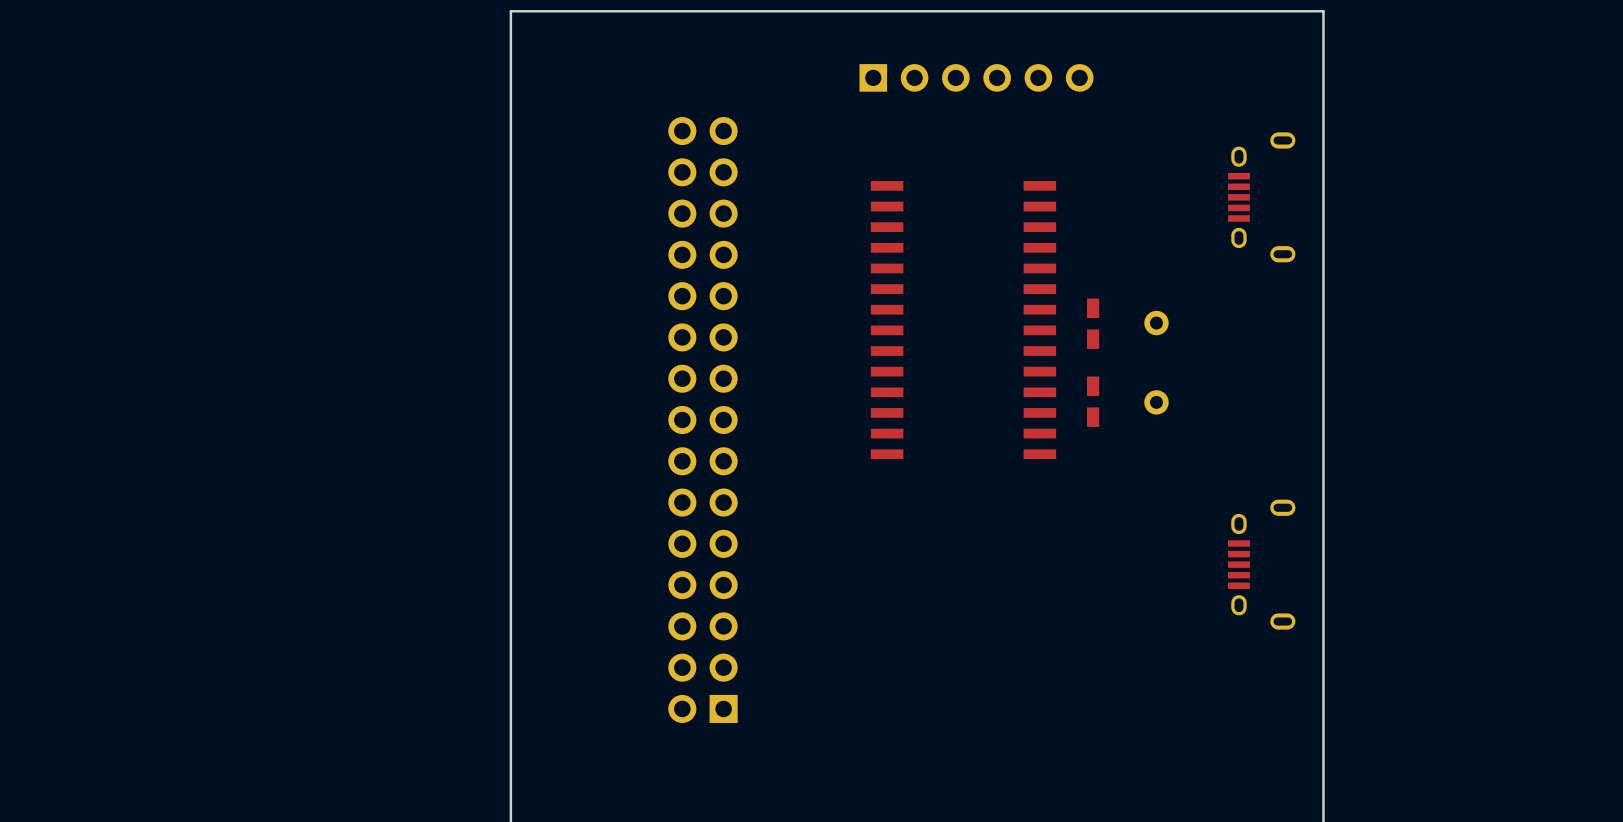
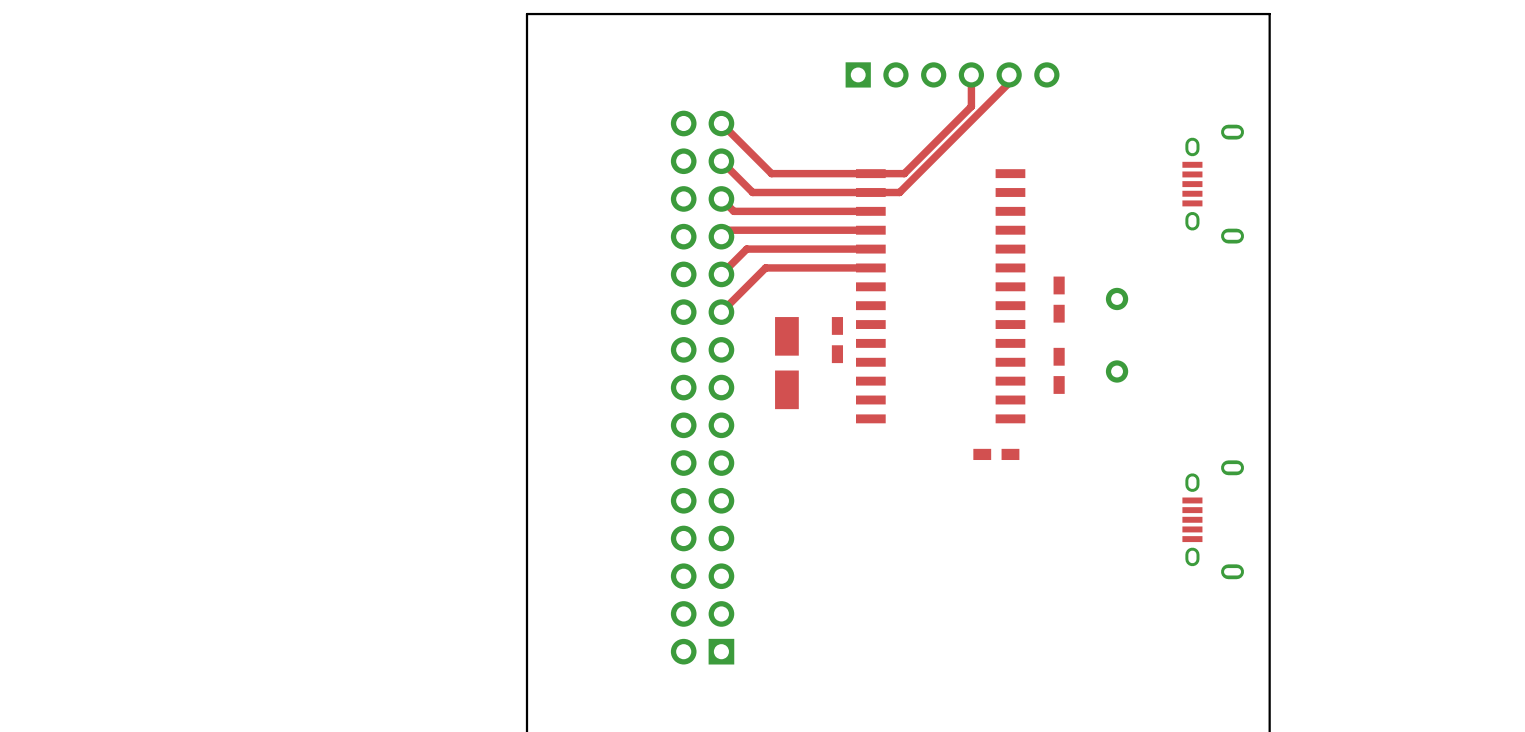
top track: none -> (971, 74) (971, 106) (904, 173) (771, 173) (721, 123)
top track: none -> (1009, 74) (1009, 82) (899, 192) (752, 192) (721, 161)
top track: none -> (721, 198) (733, 211) (870, 211)
top track: none -> (870, 230) (727, 230) (721, 236)
top track: none -> (870, 249) (746, 249) (721, 274)
top track: none -> (870, 267) (765, 267) (721, 312)
part: none -> (837, 340)
part: none -> (786, 363)
part: none -> (996, 454)

